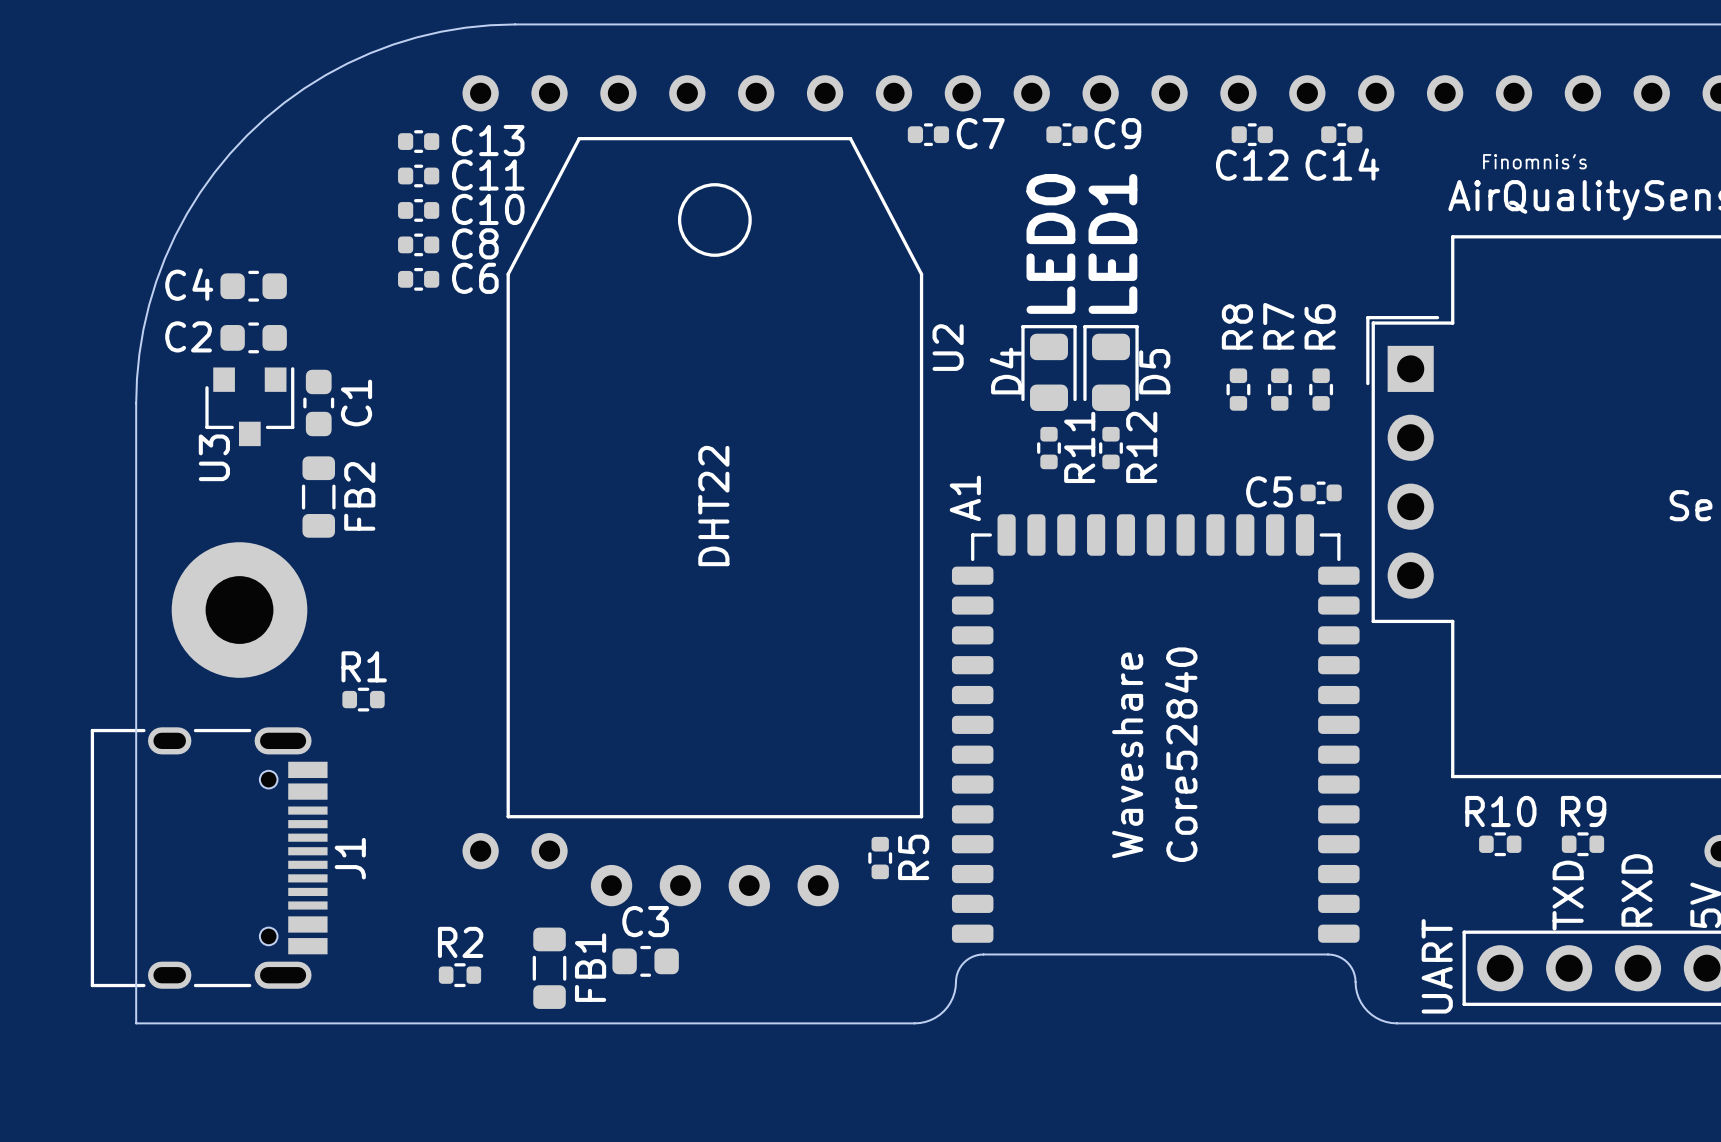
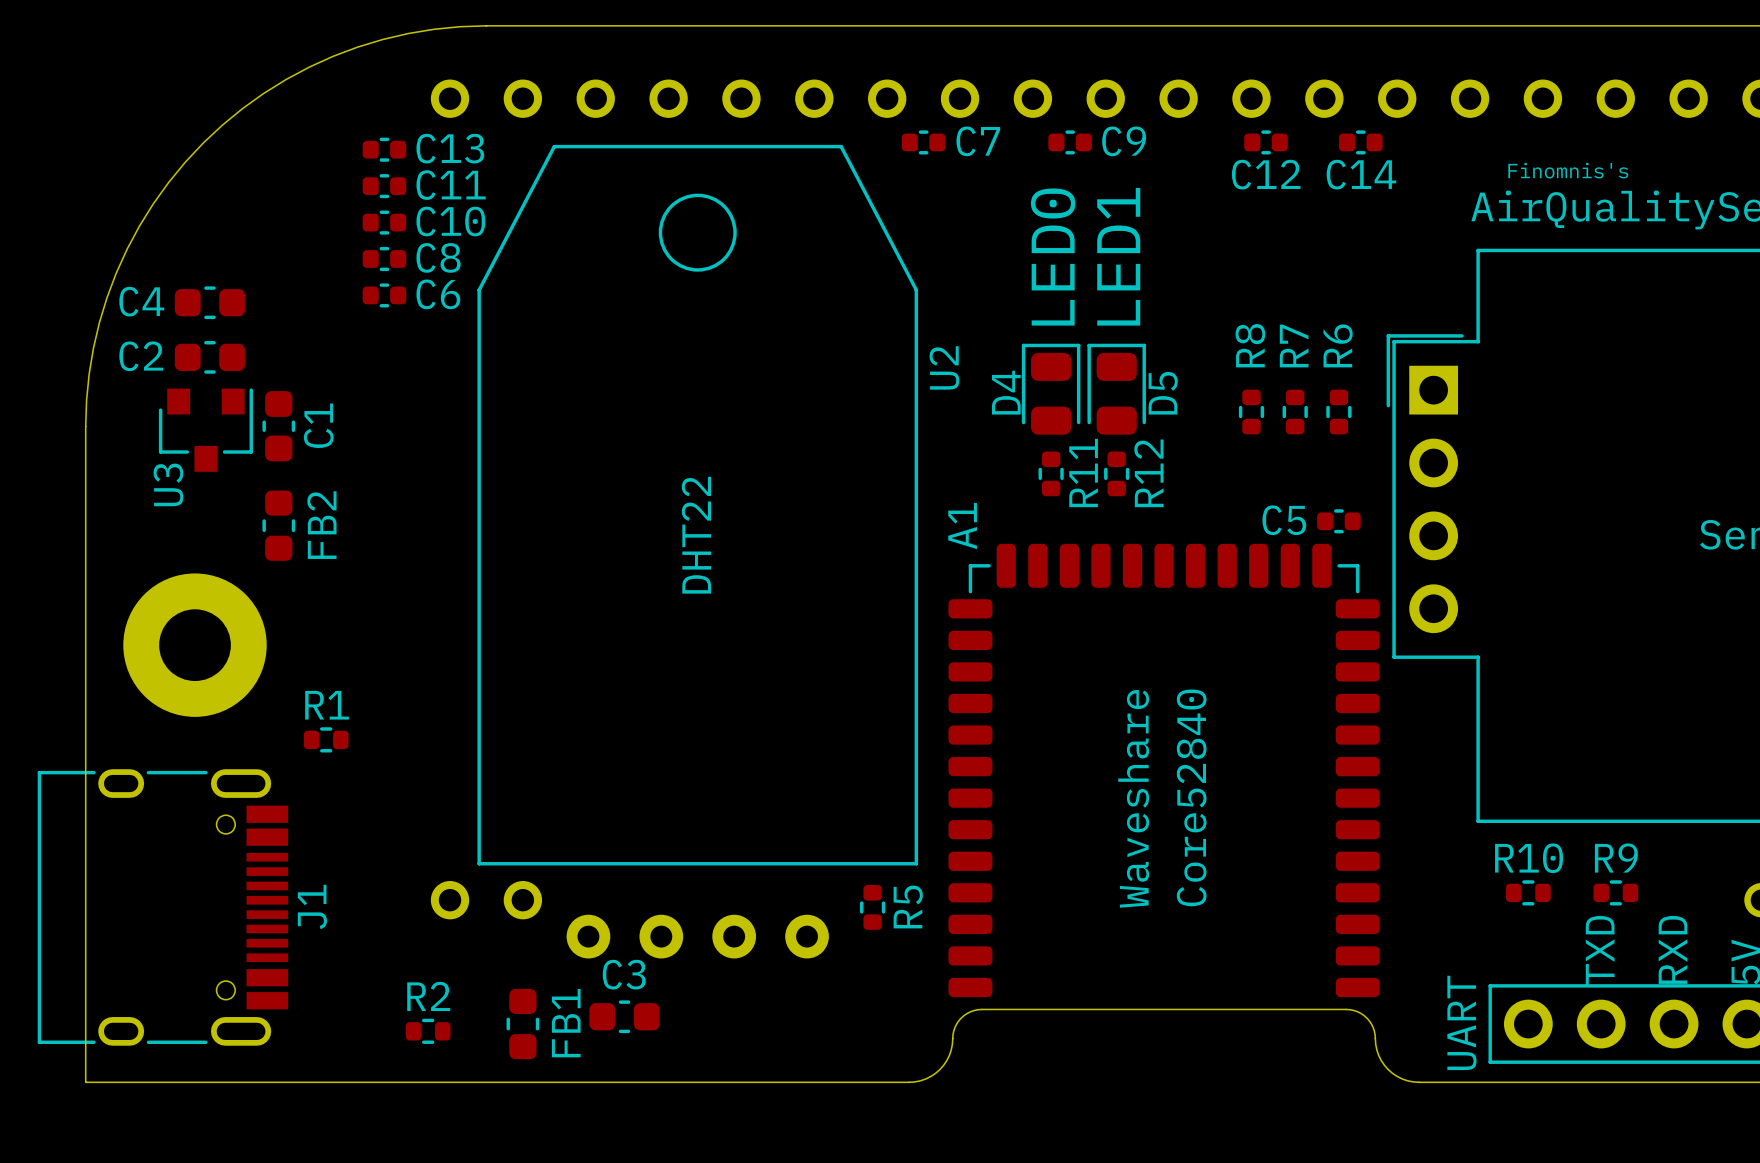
FB2 footprint: [301, 456, 336, 538] -> [262, 490, 296, 561]
FB1 footprint: [532, 927, 567, 1009] -> [506, 988, 540, 1060]

